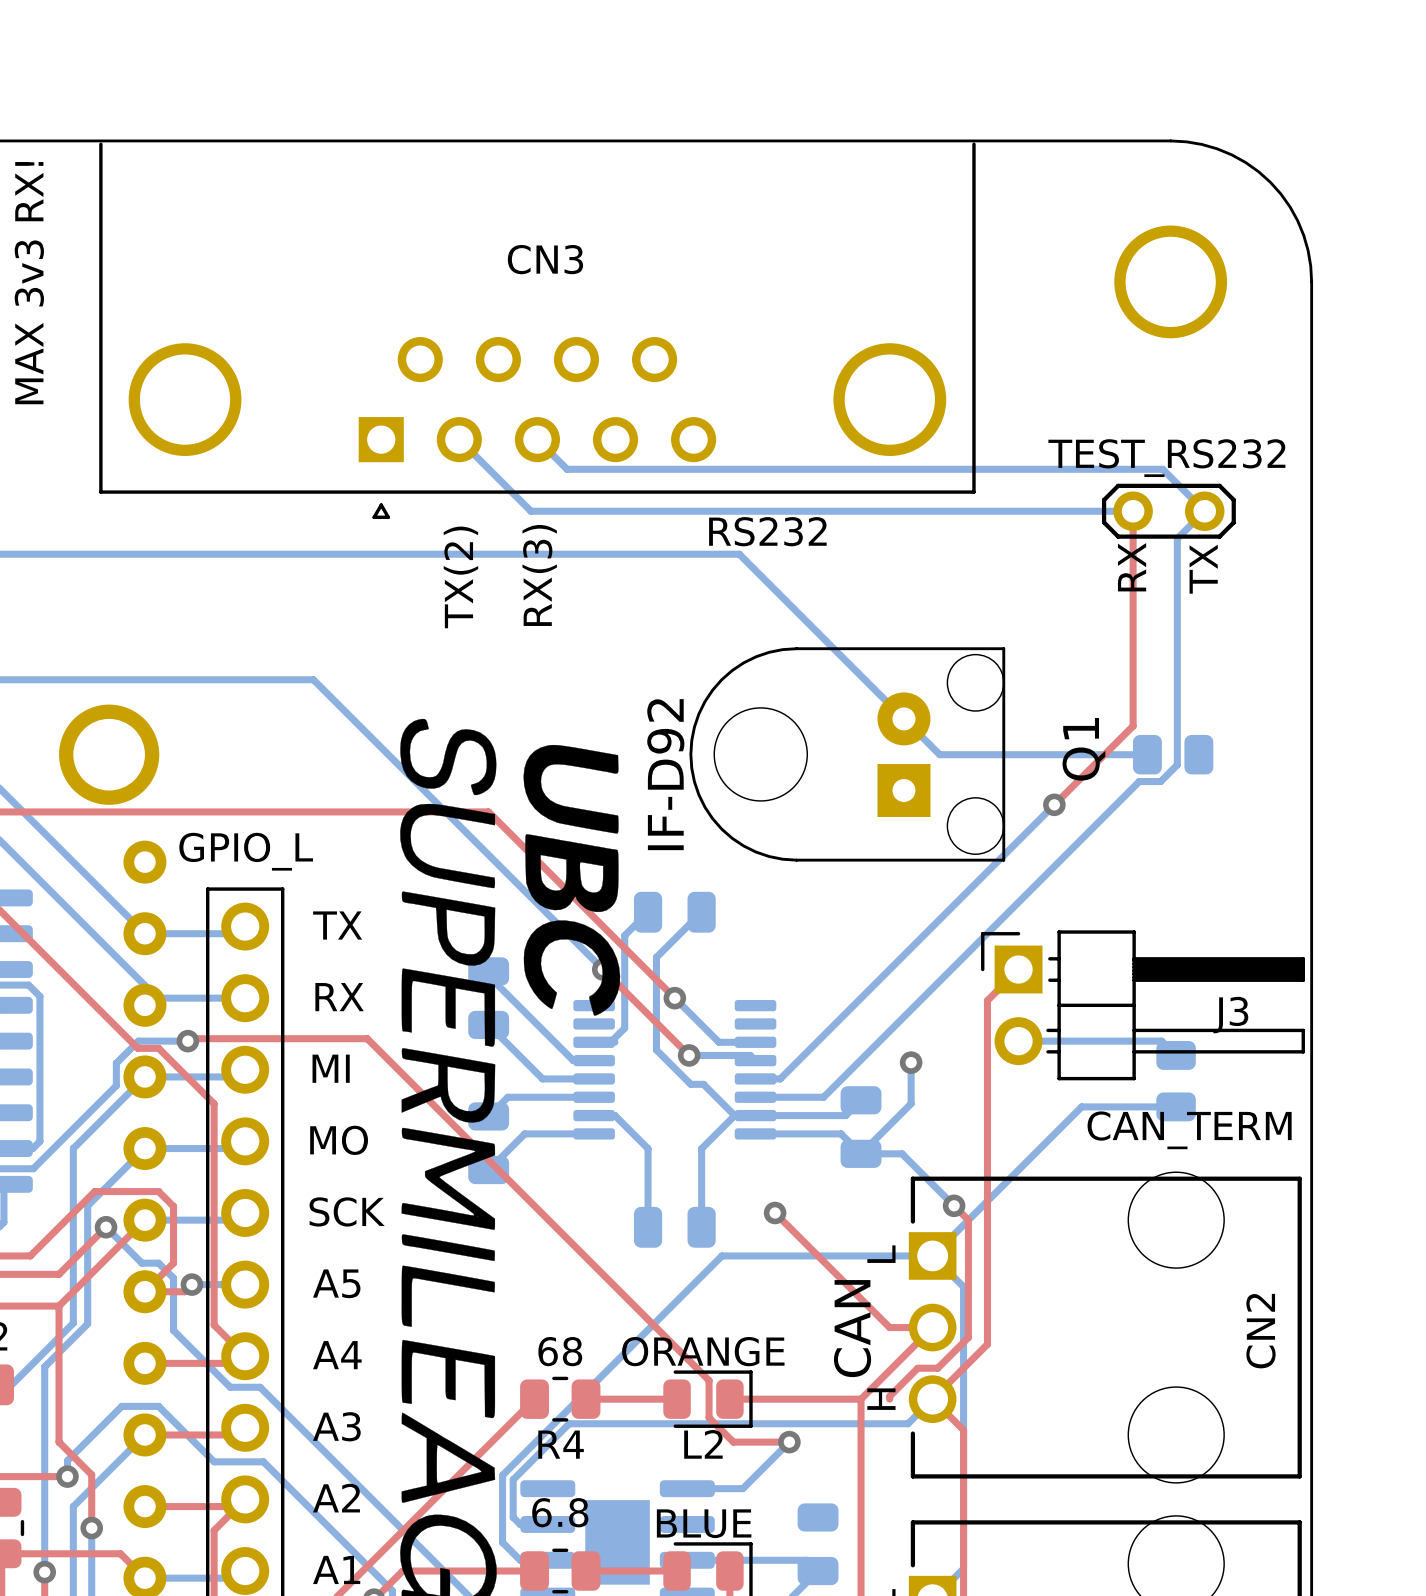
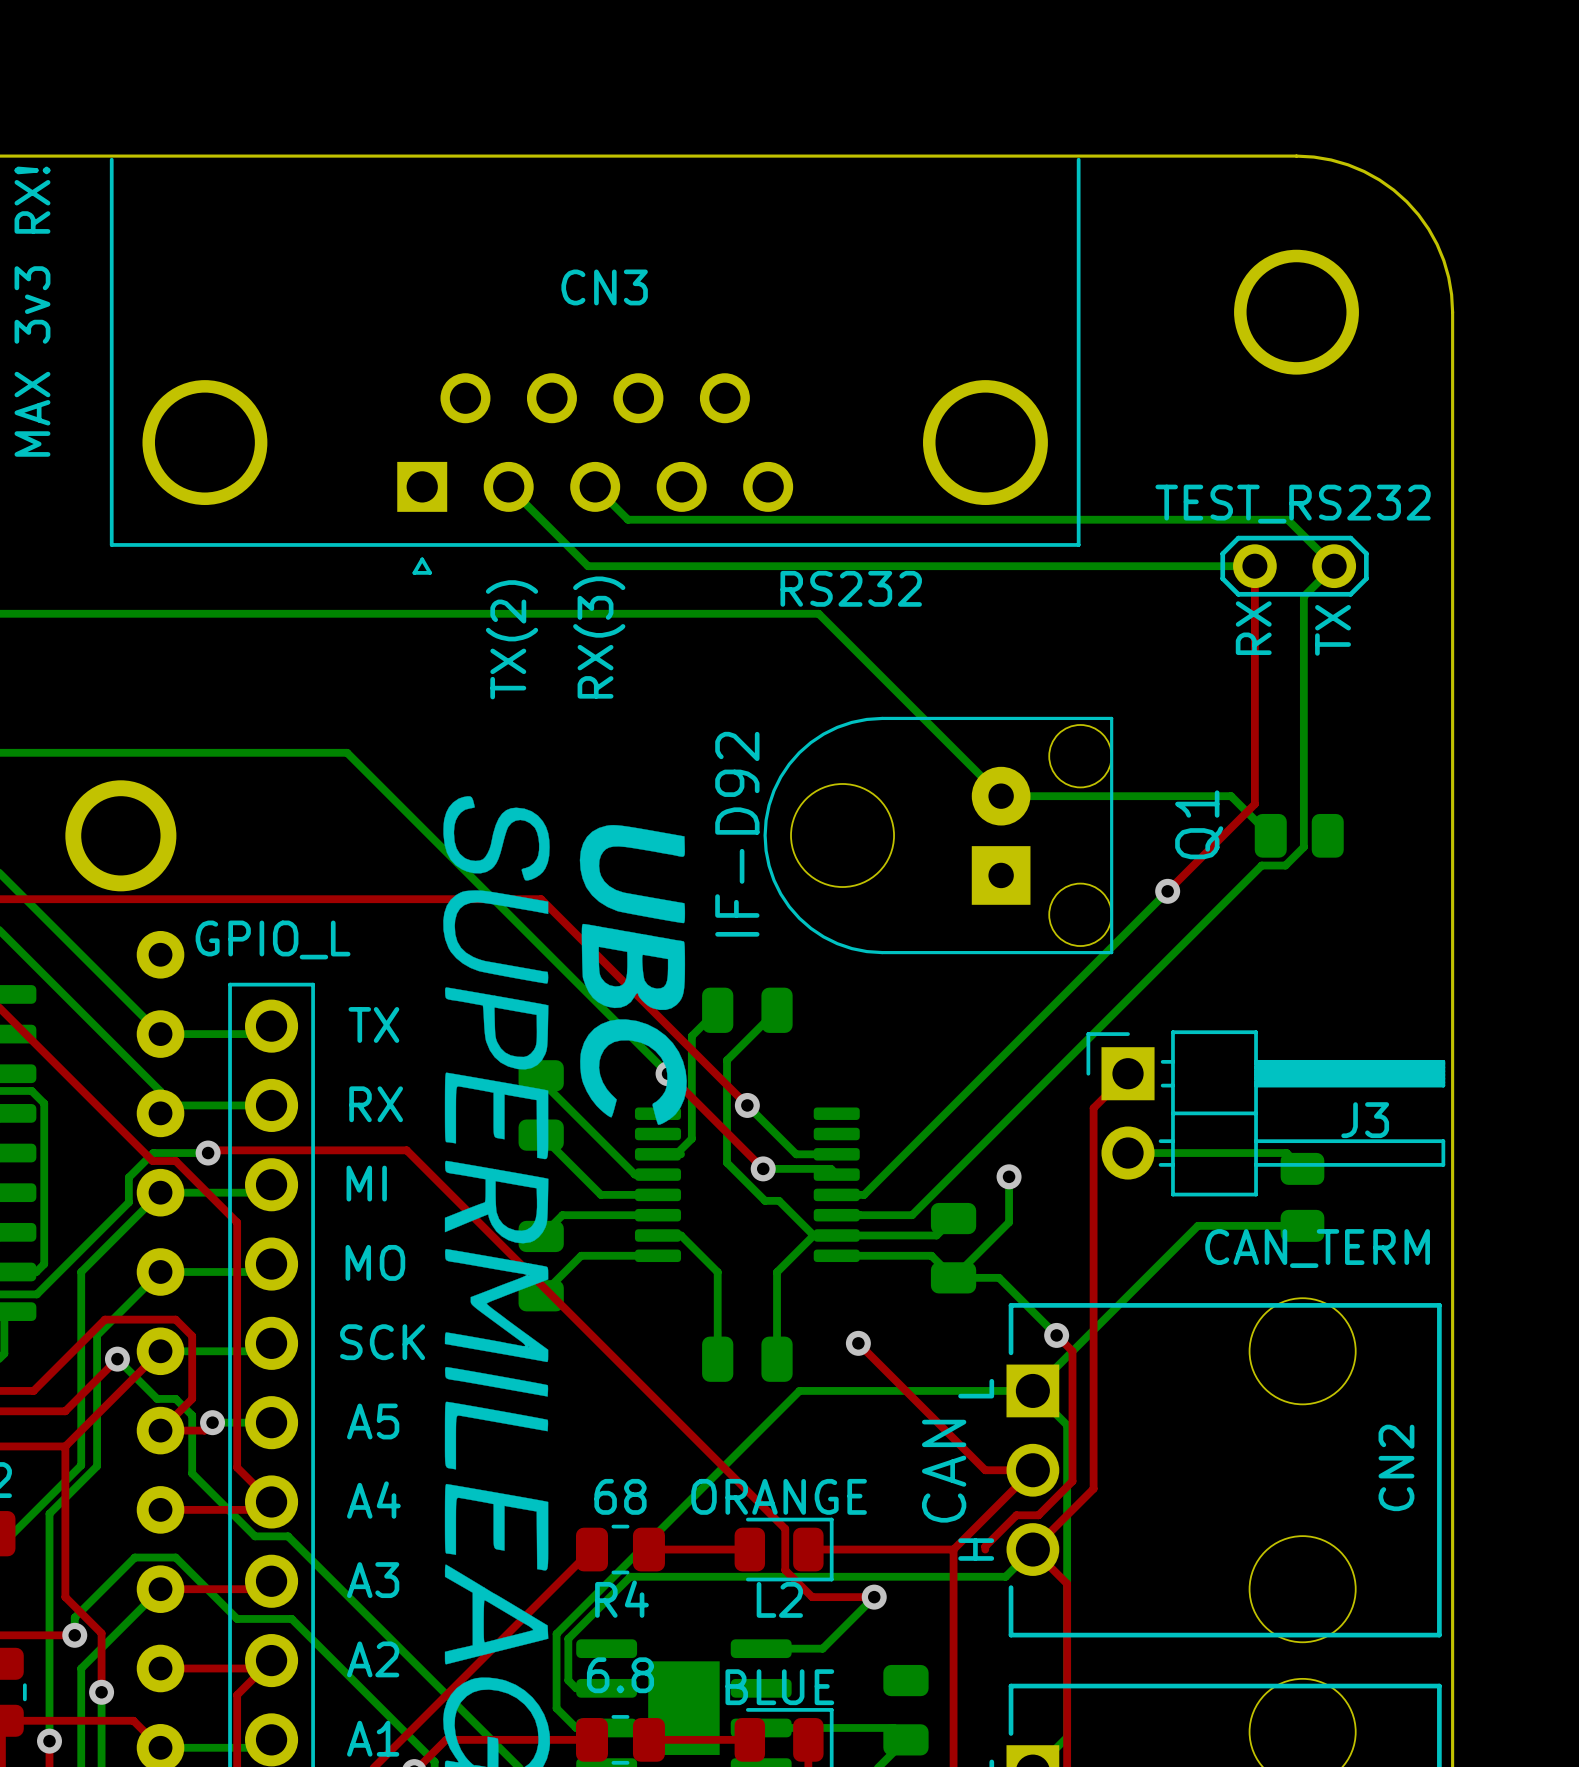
bottom track: (903, 718) (939, 754) (1147, 754) -> (1001, 796) (1231, 796) (1270, 835)

